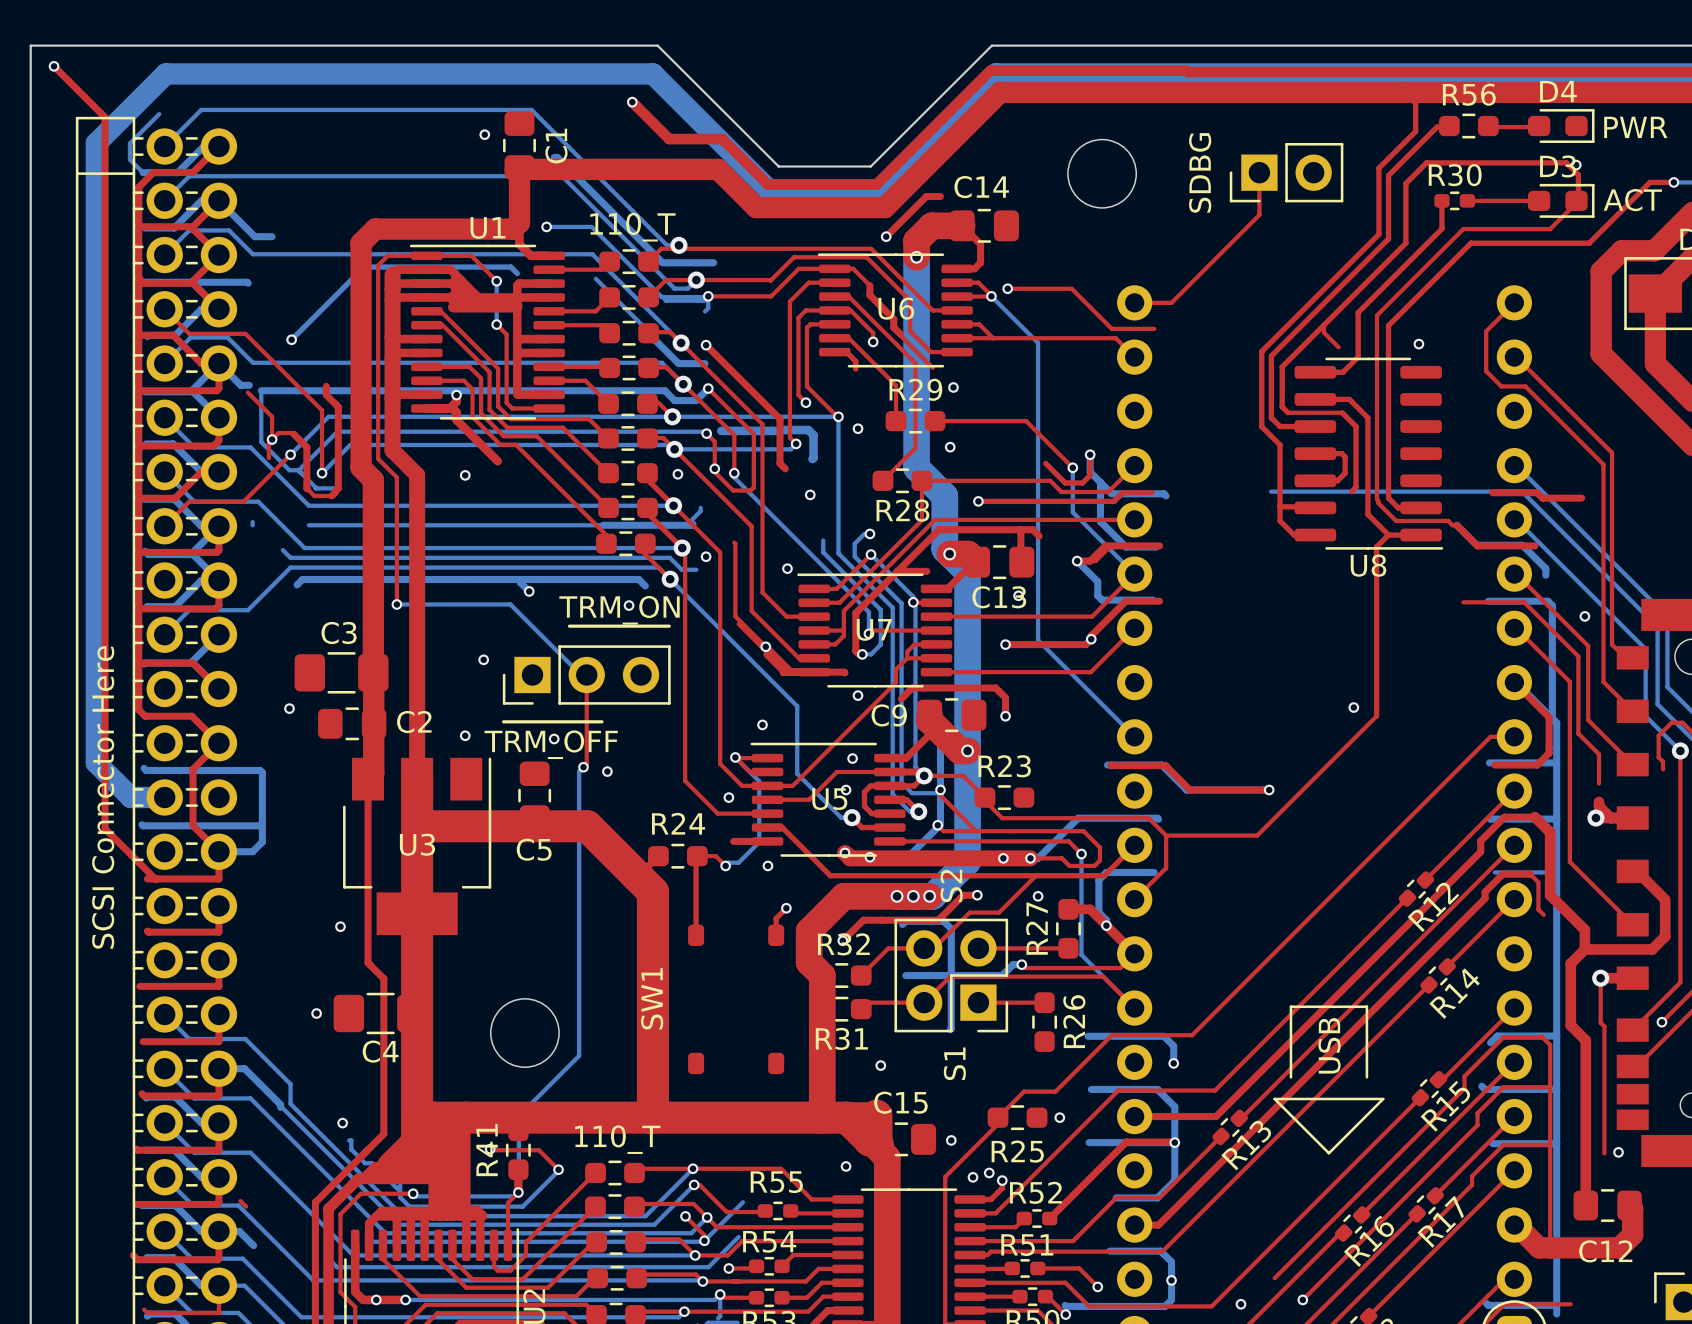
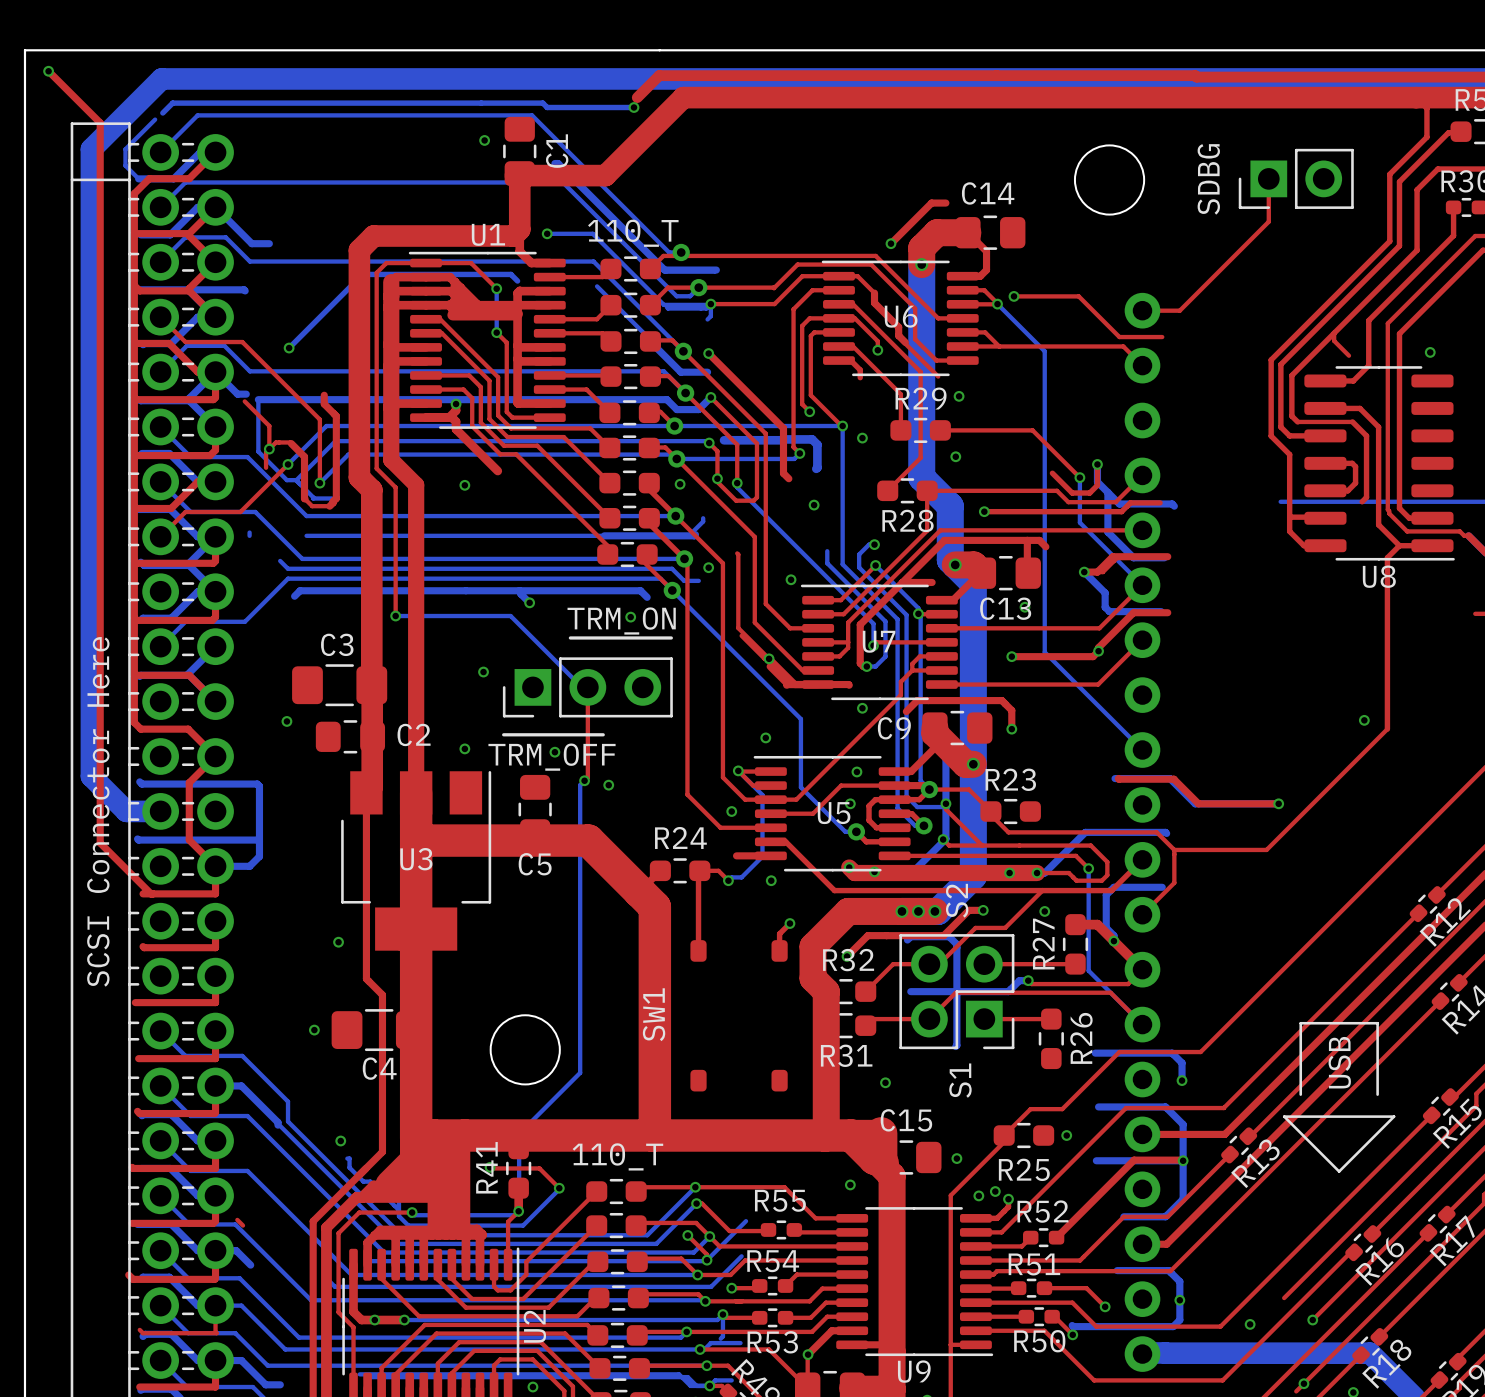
board edge: (657, 45) (778, 166) (870, 166) (991, 45) -> (659, 50) (997, 50)
top track: (990, 70) (876, 184) (767, 184) (722, 139) (669, 139) (632, 102) -> (996, 75) (659, 75) (637, 97)
bottom track: (652, 73) (769, 190) (879, 190) (995, 73) -> (654, 78) (1001, 78)
top track: (1000, 92) (884, 207) (756, 207) (718, 169) (604, 169) -> (1006, 97) (683, 97) (605, 175)
bottom track: none -> (633, 107) (547, 107) (542, 103) (172, 103) (162, 112)

